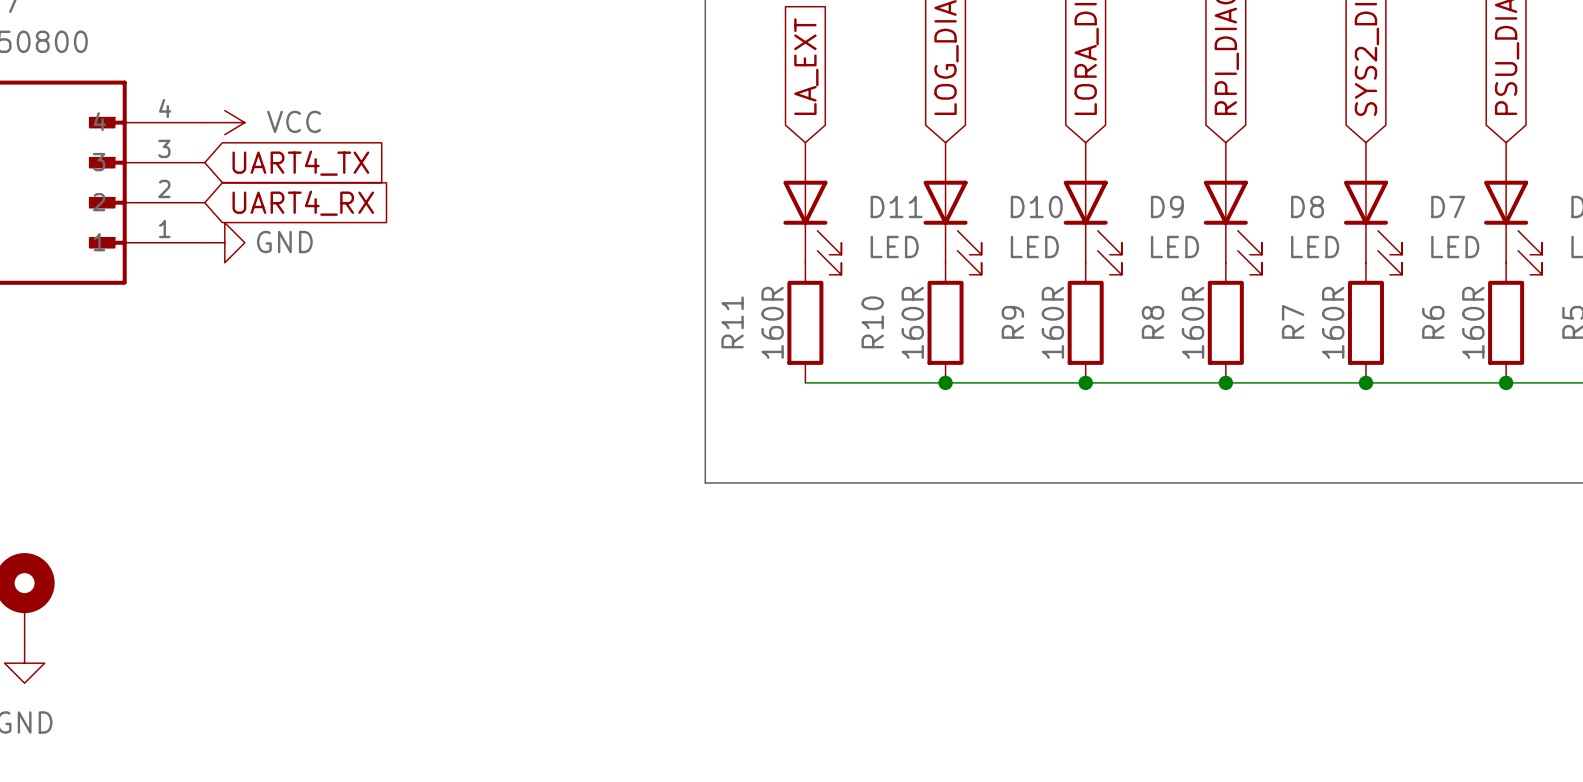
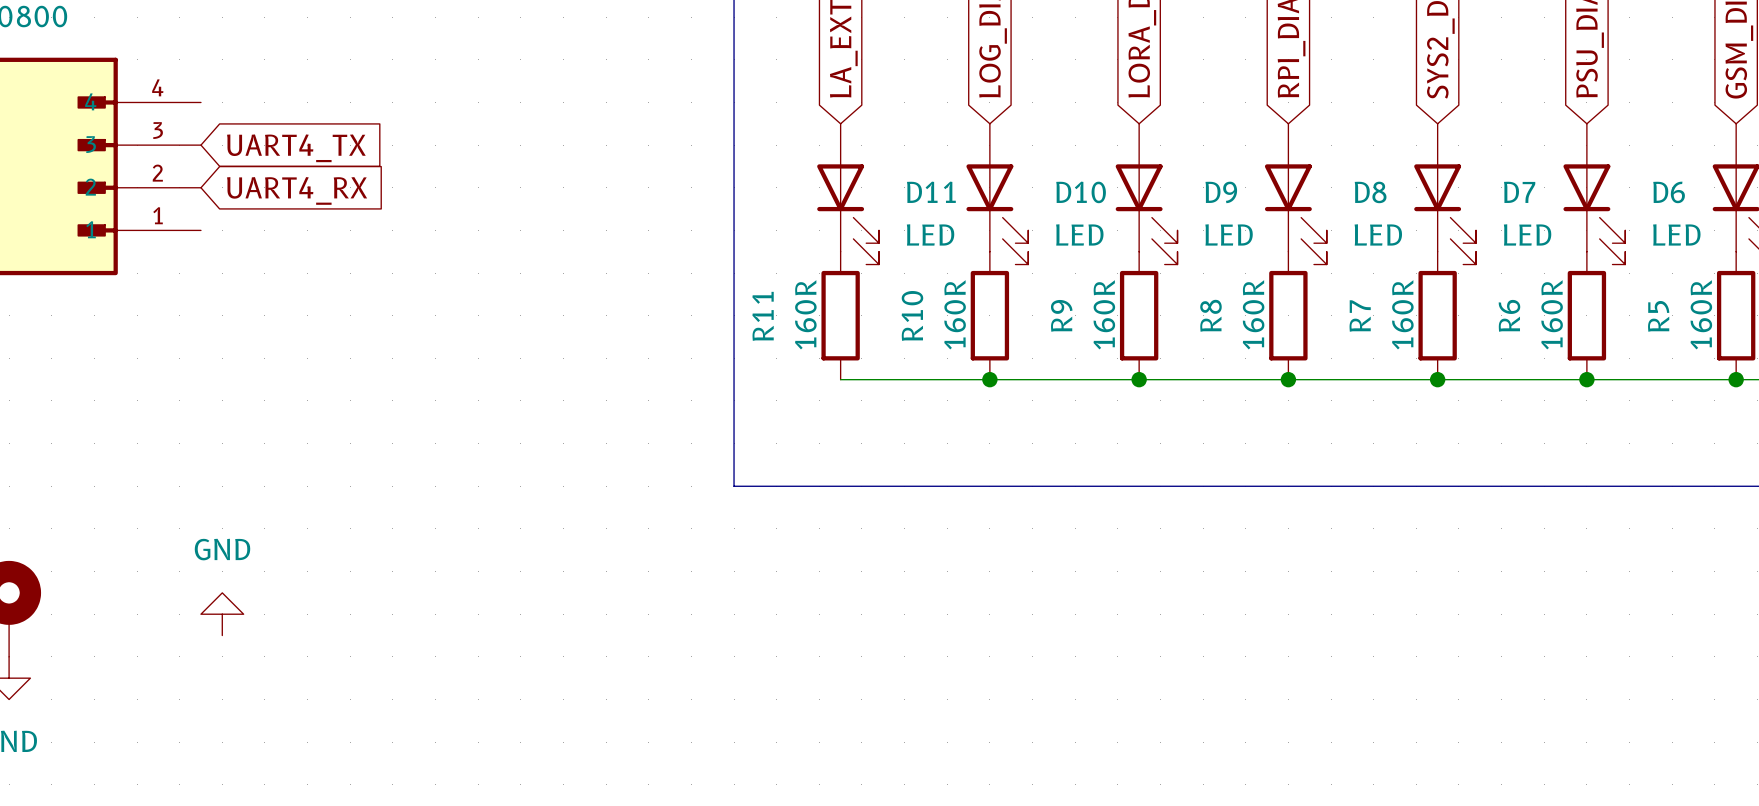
power symbol: VCC (224, 122) -> none
power symbol: GND (224, 242) -> none
power symbol: none -> GND (222, 614)

